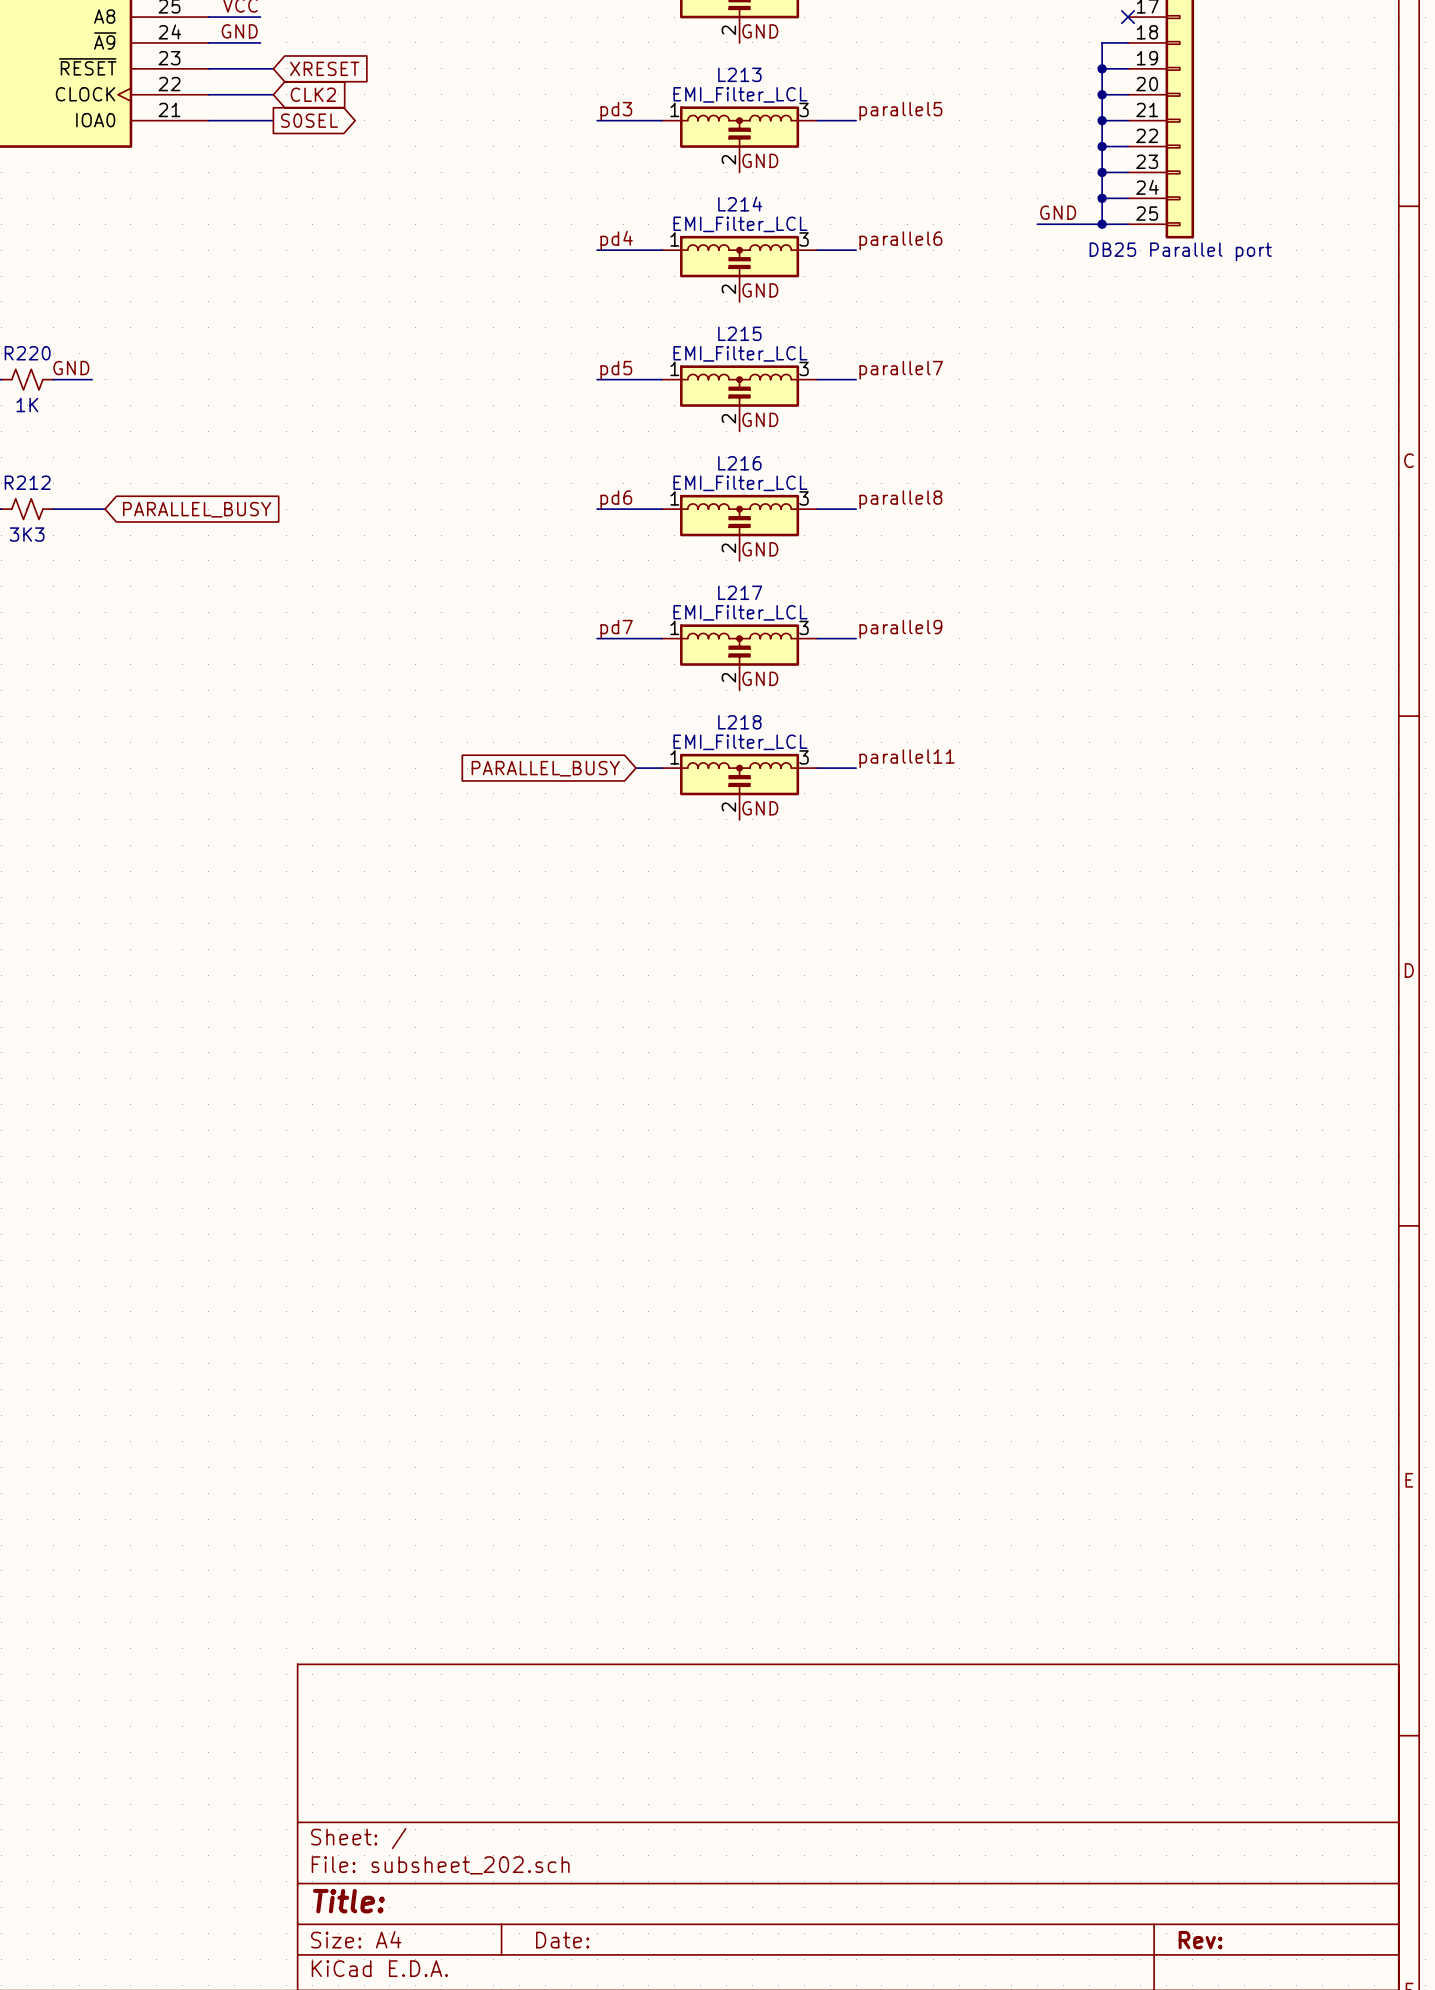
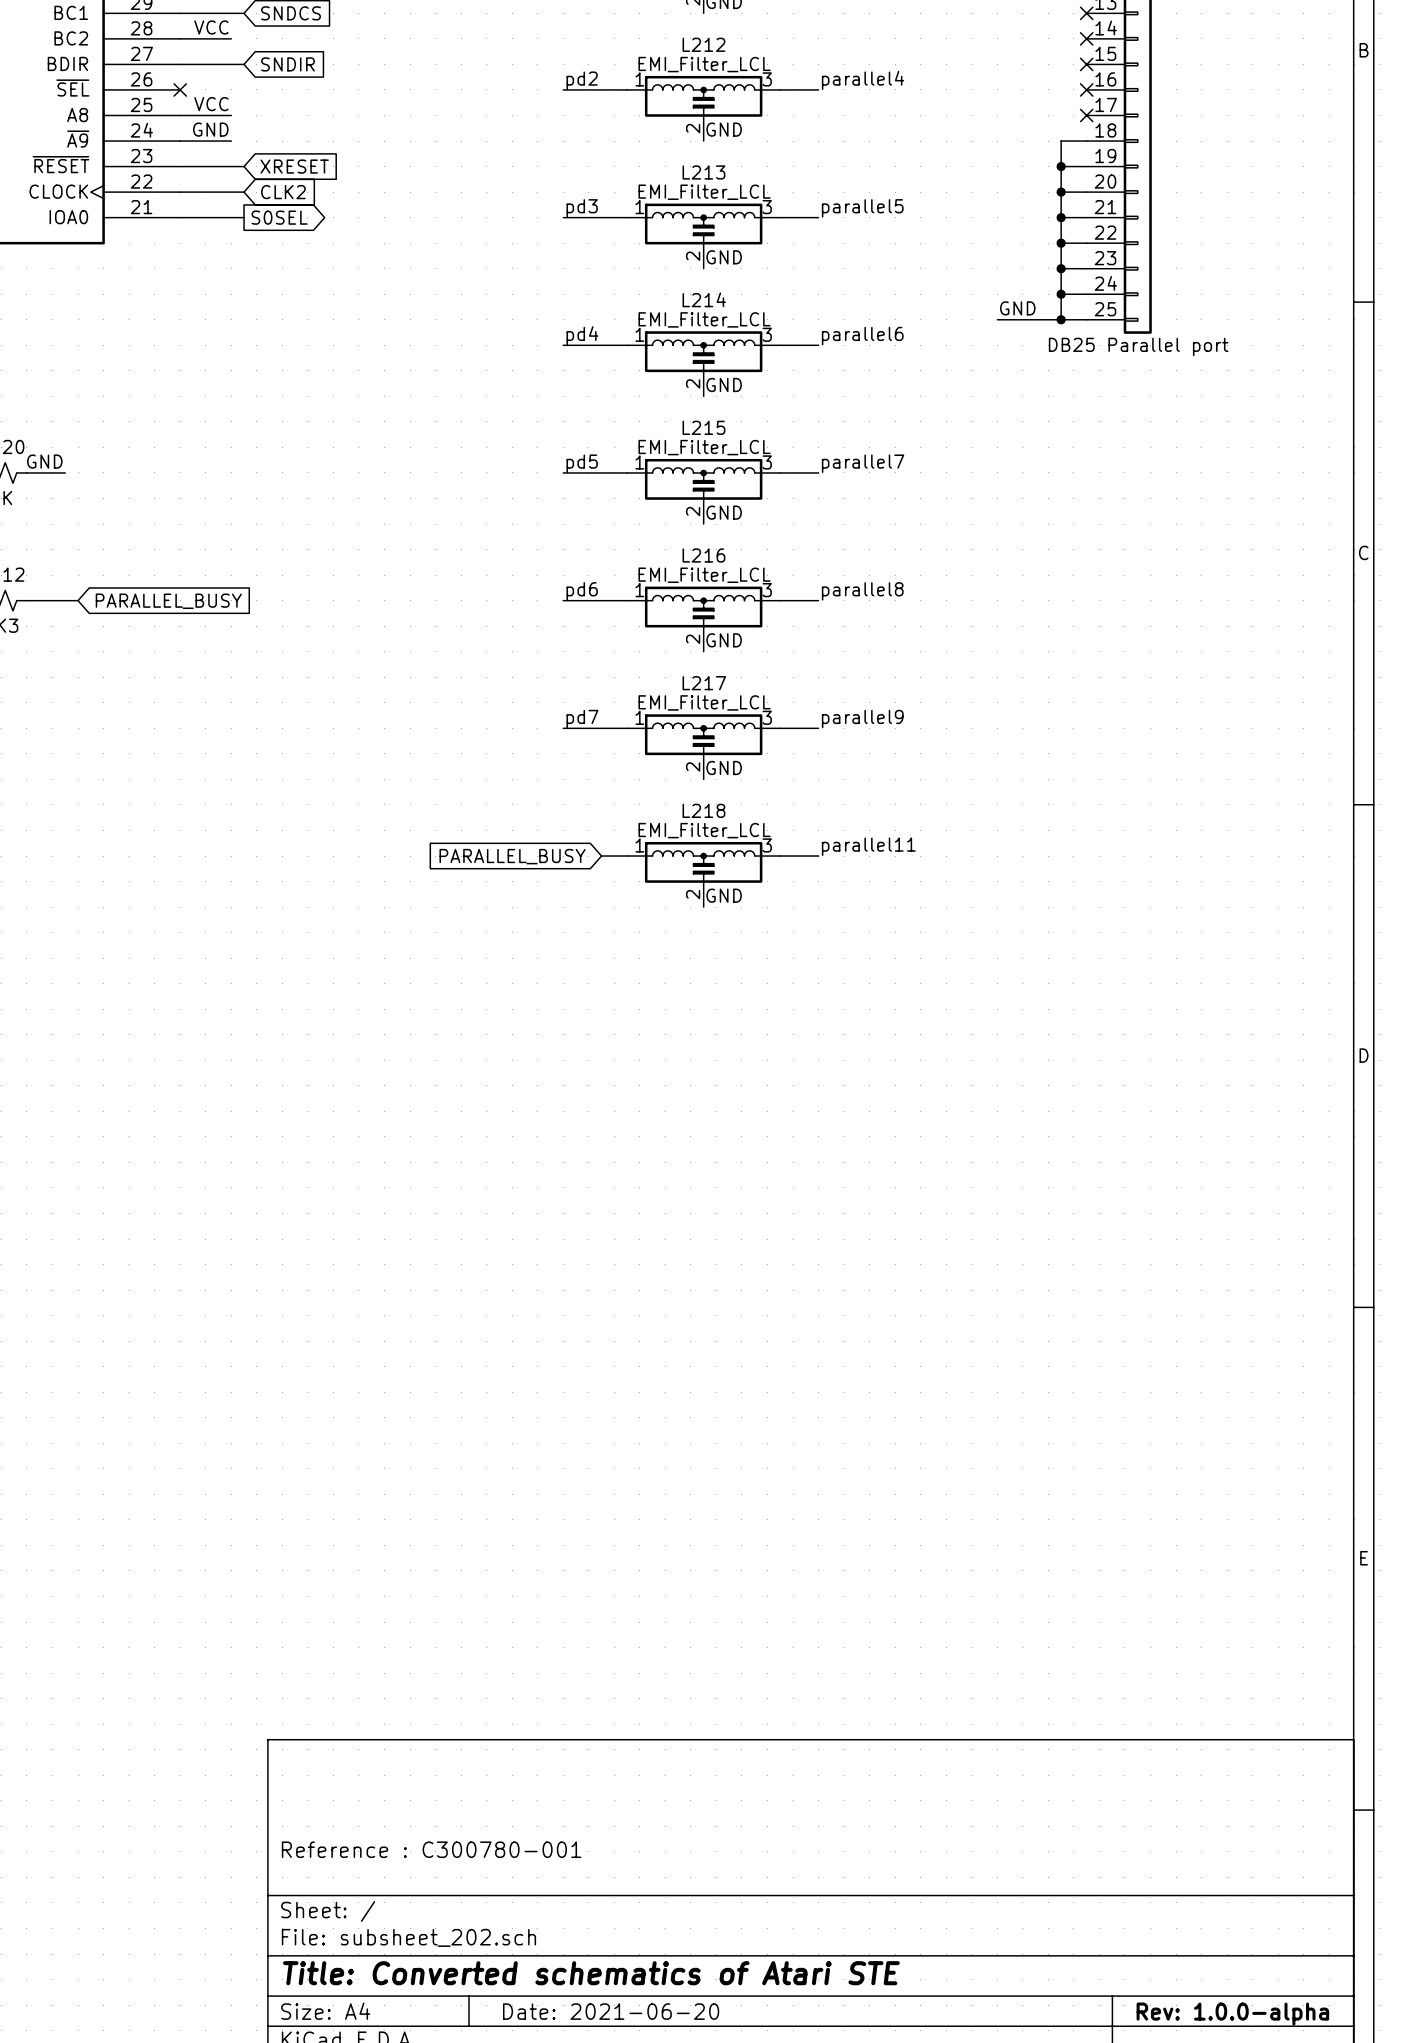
title block: none -> Reference : C300780-001 (431, 1849)
title block: Title: (348, 1901) -> Title: Converted schematics of Atari STE (591, 1973)
title block: Date: (562, 1940) -> Date: 2021-06-20 (611, 2011)
title block: Rev: (1200, 1940) -> Rev: 1.0.0-alpha (1232, 2014)

